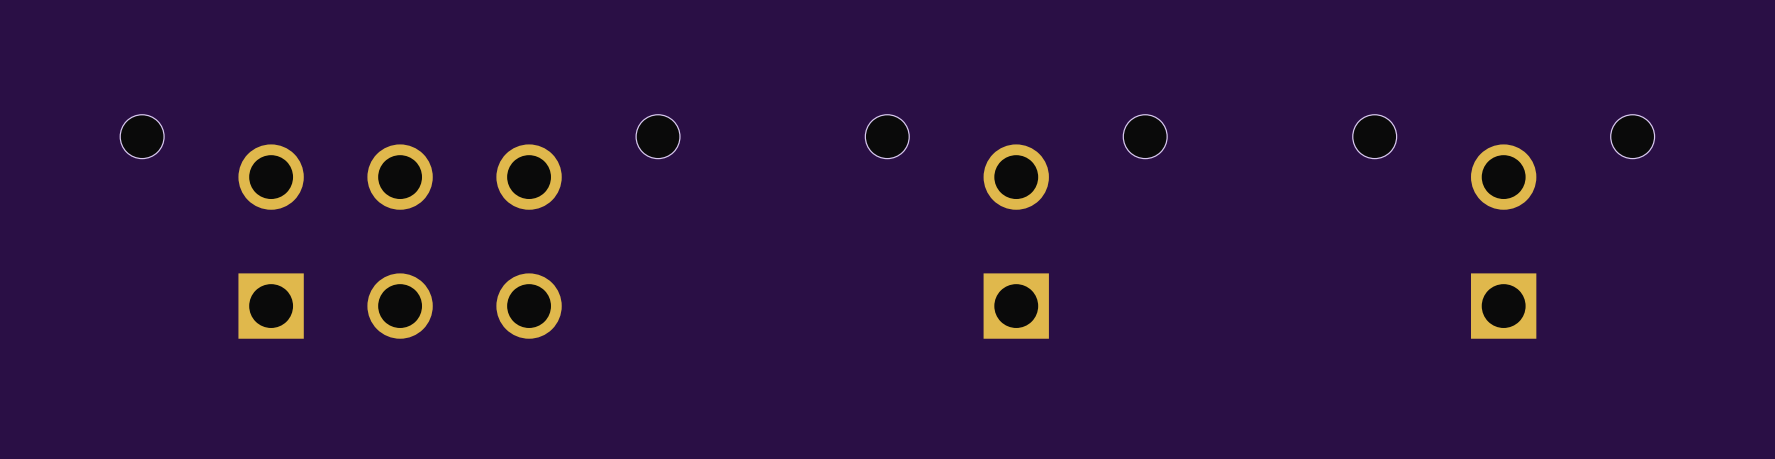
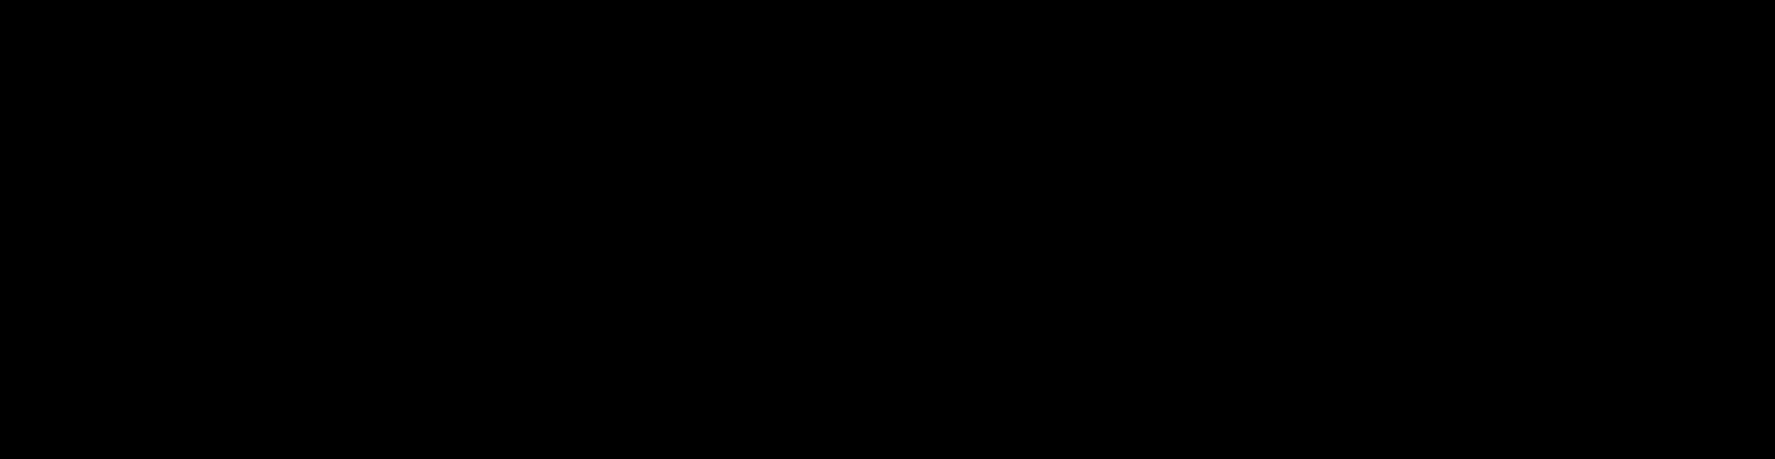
part: (400, 226) -> none
part: (1016, 226) -> none
part: (1503, 226) -> none

